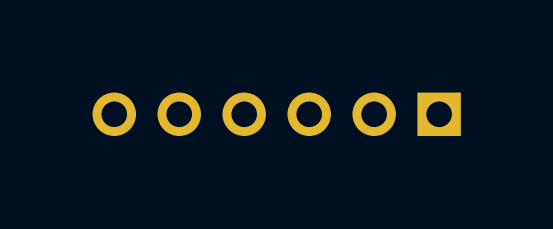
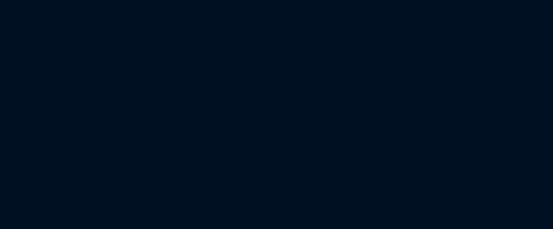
part: (276, 114) -> none

